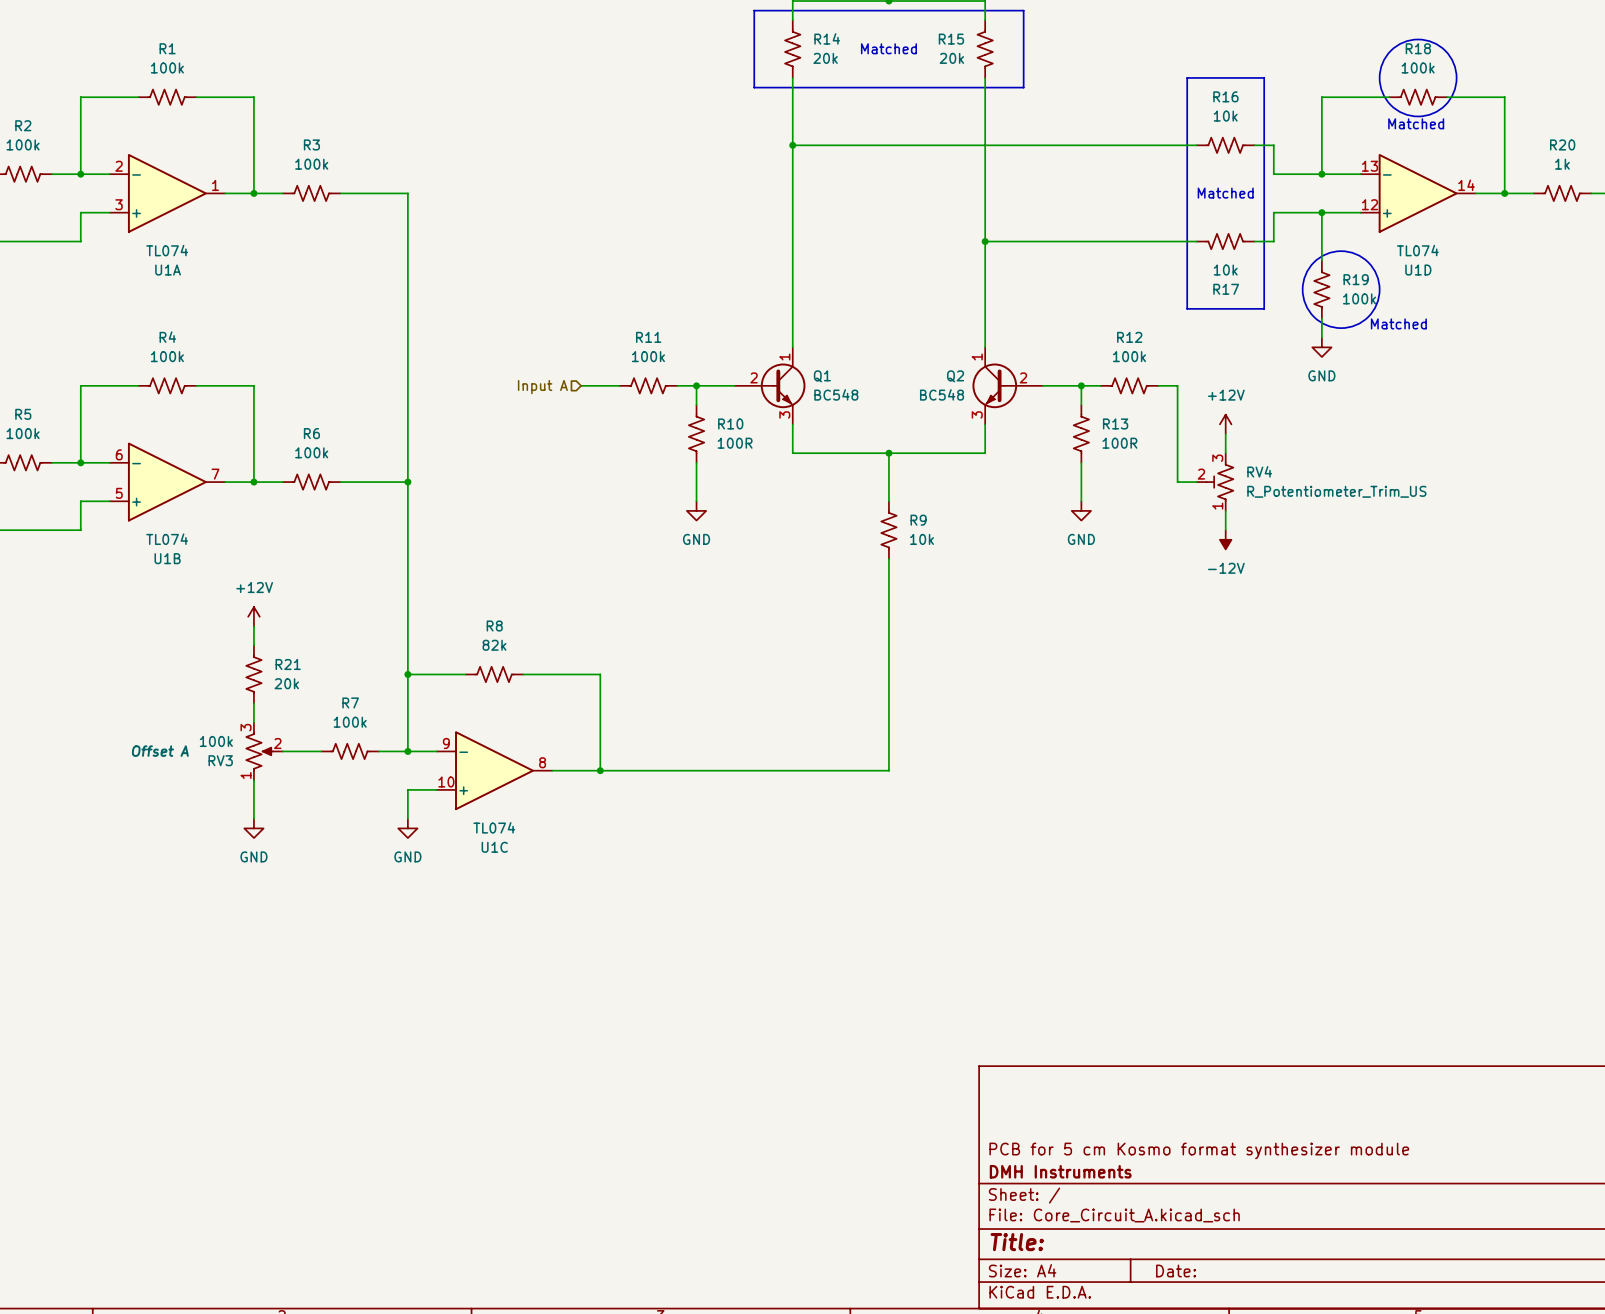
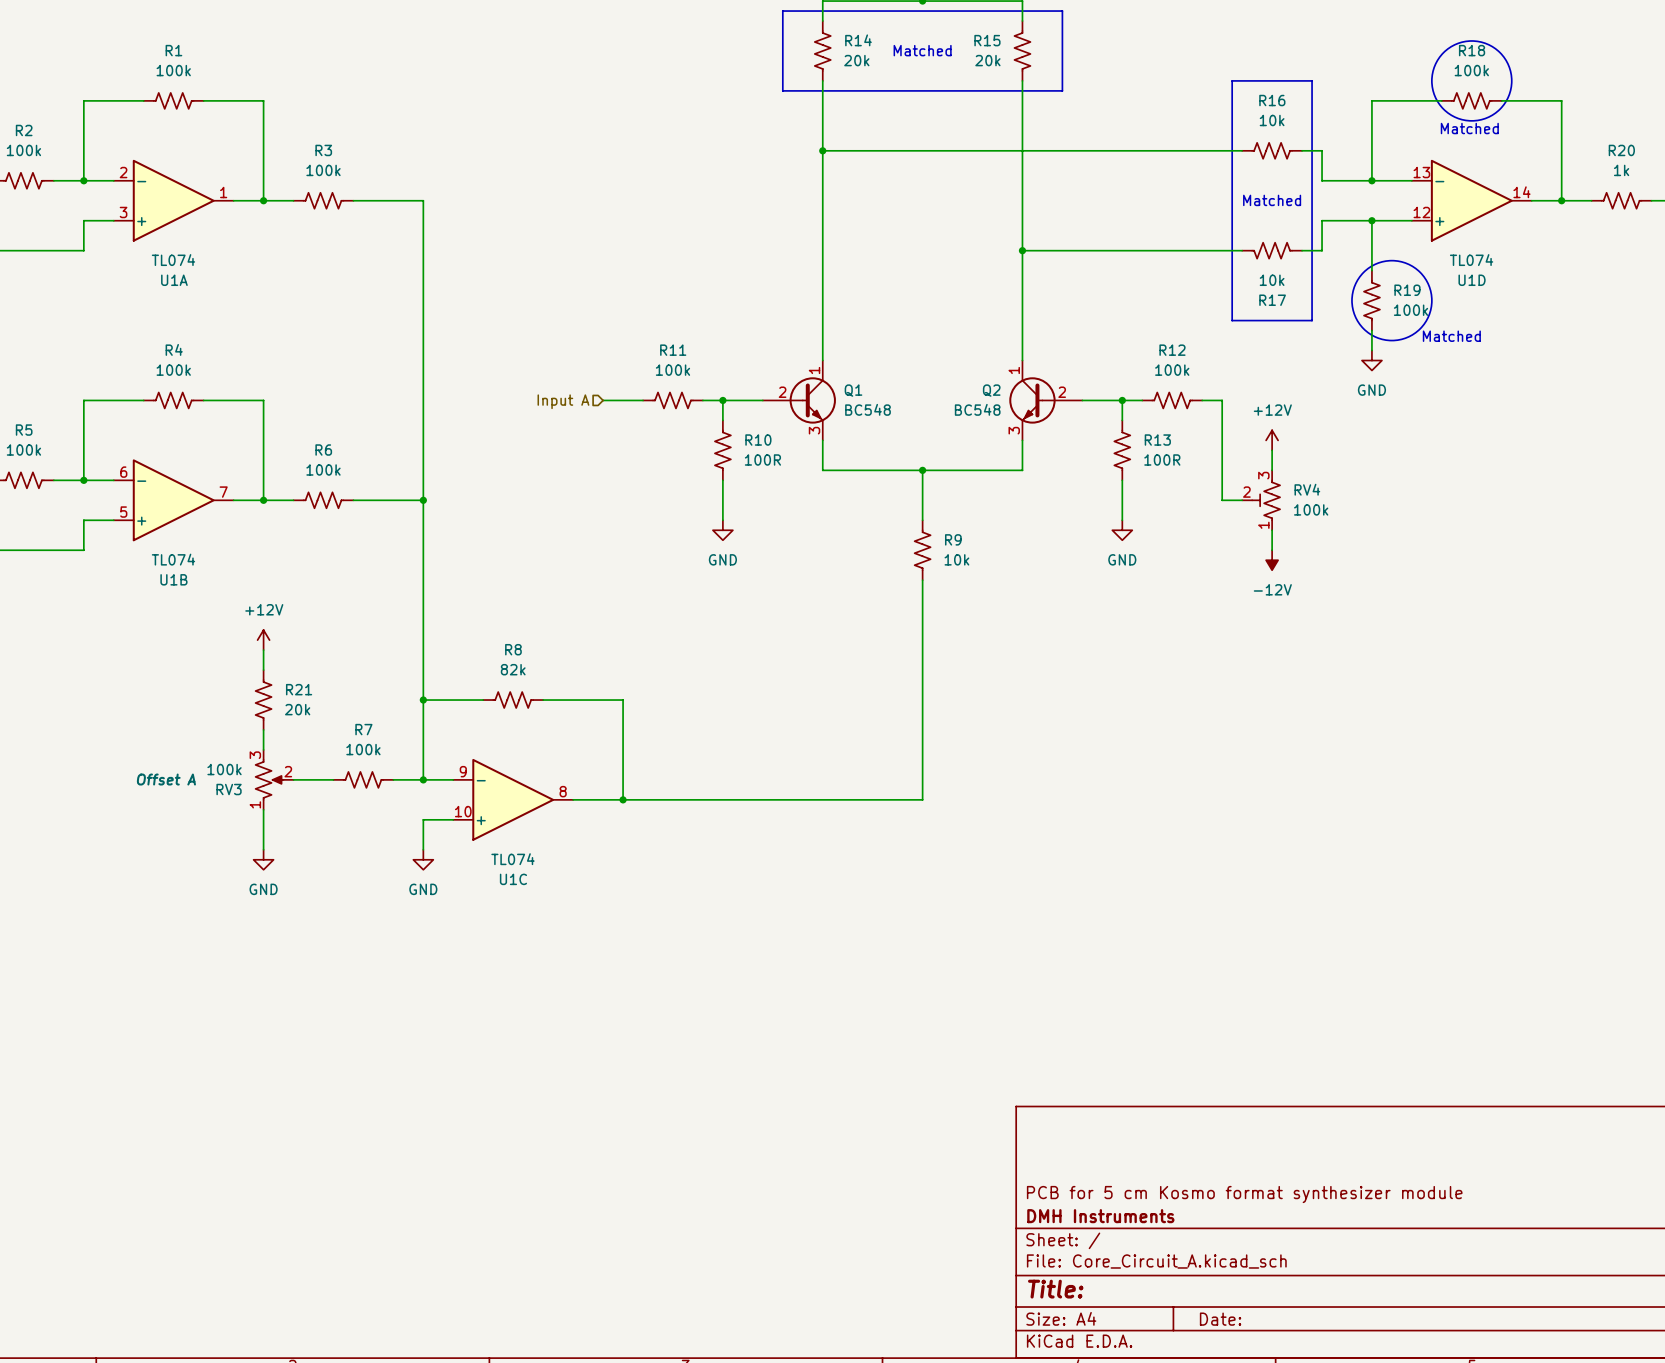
RV4 value: R_Potentiometer_Trim_US (1336, 491) -> 100k (1311, 509)

